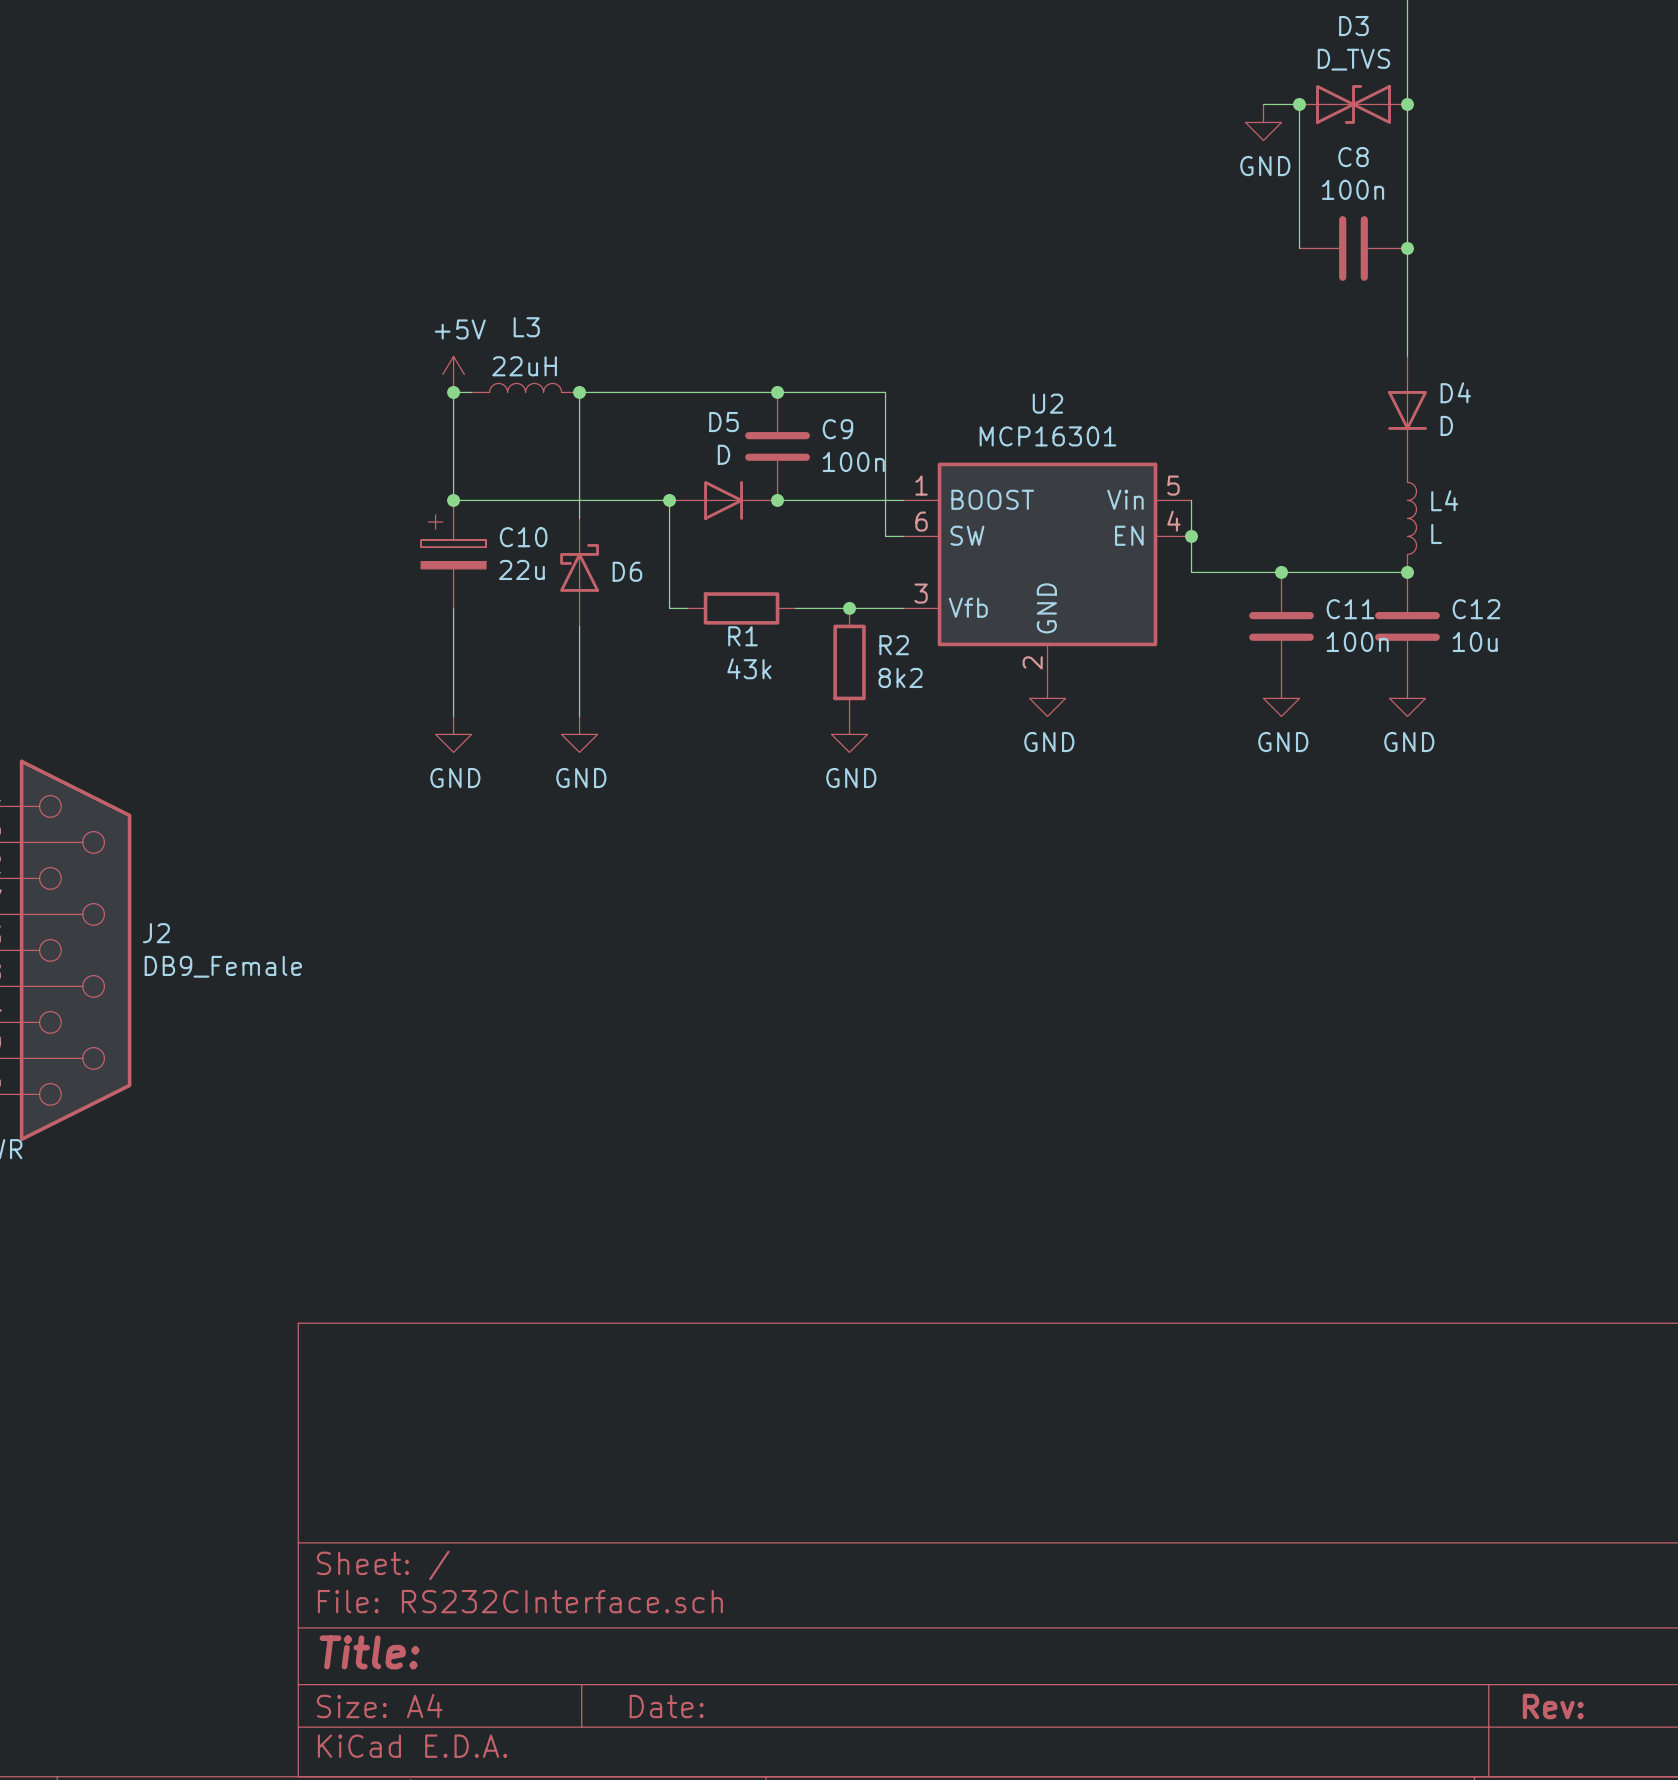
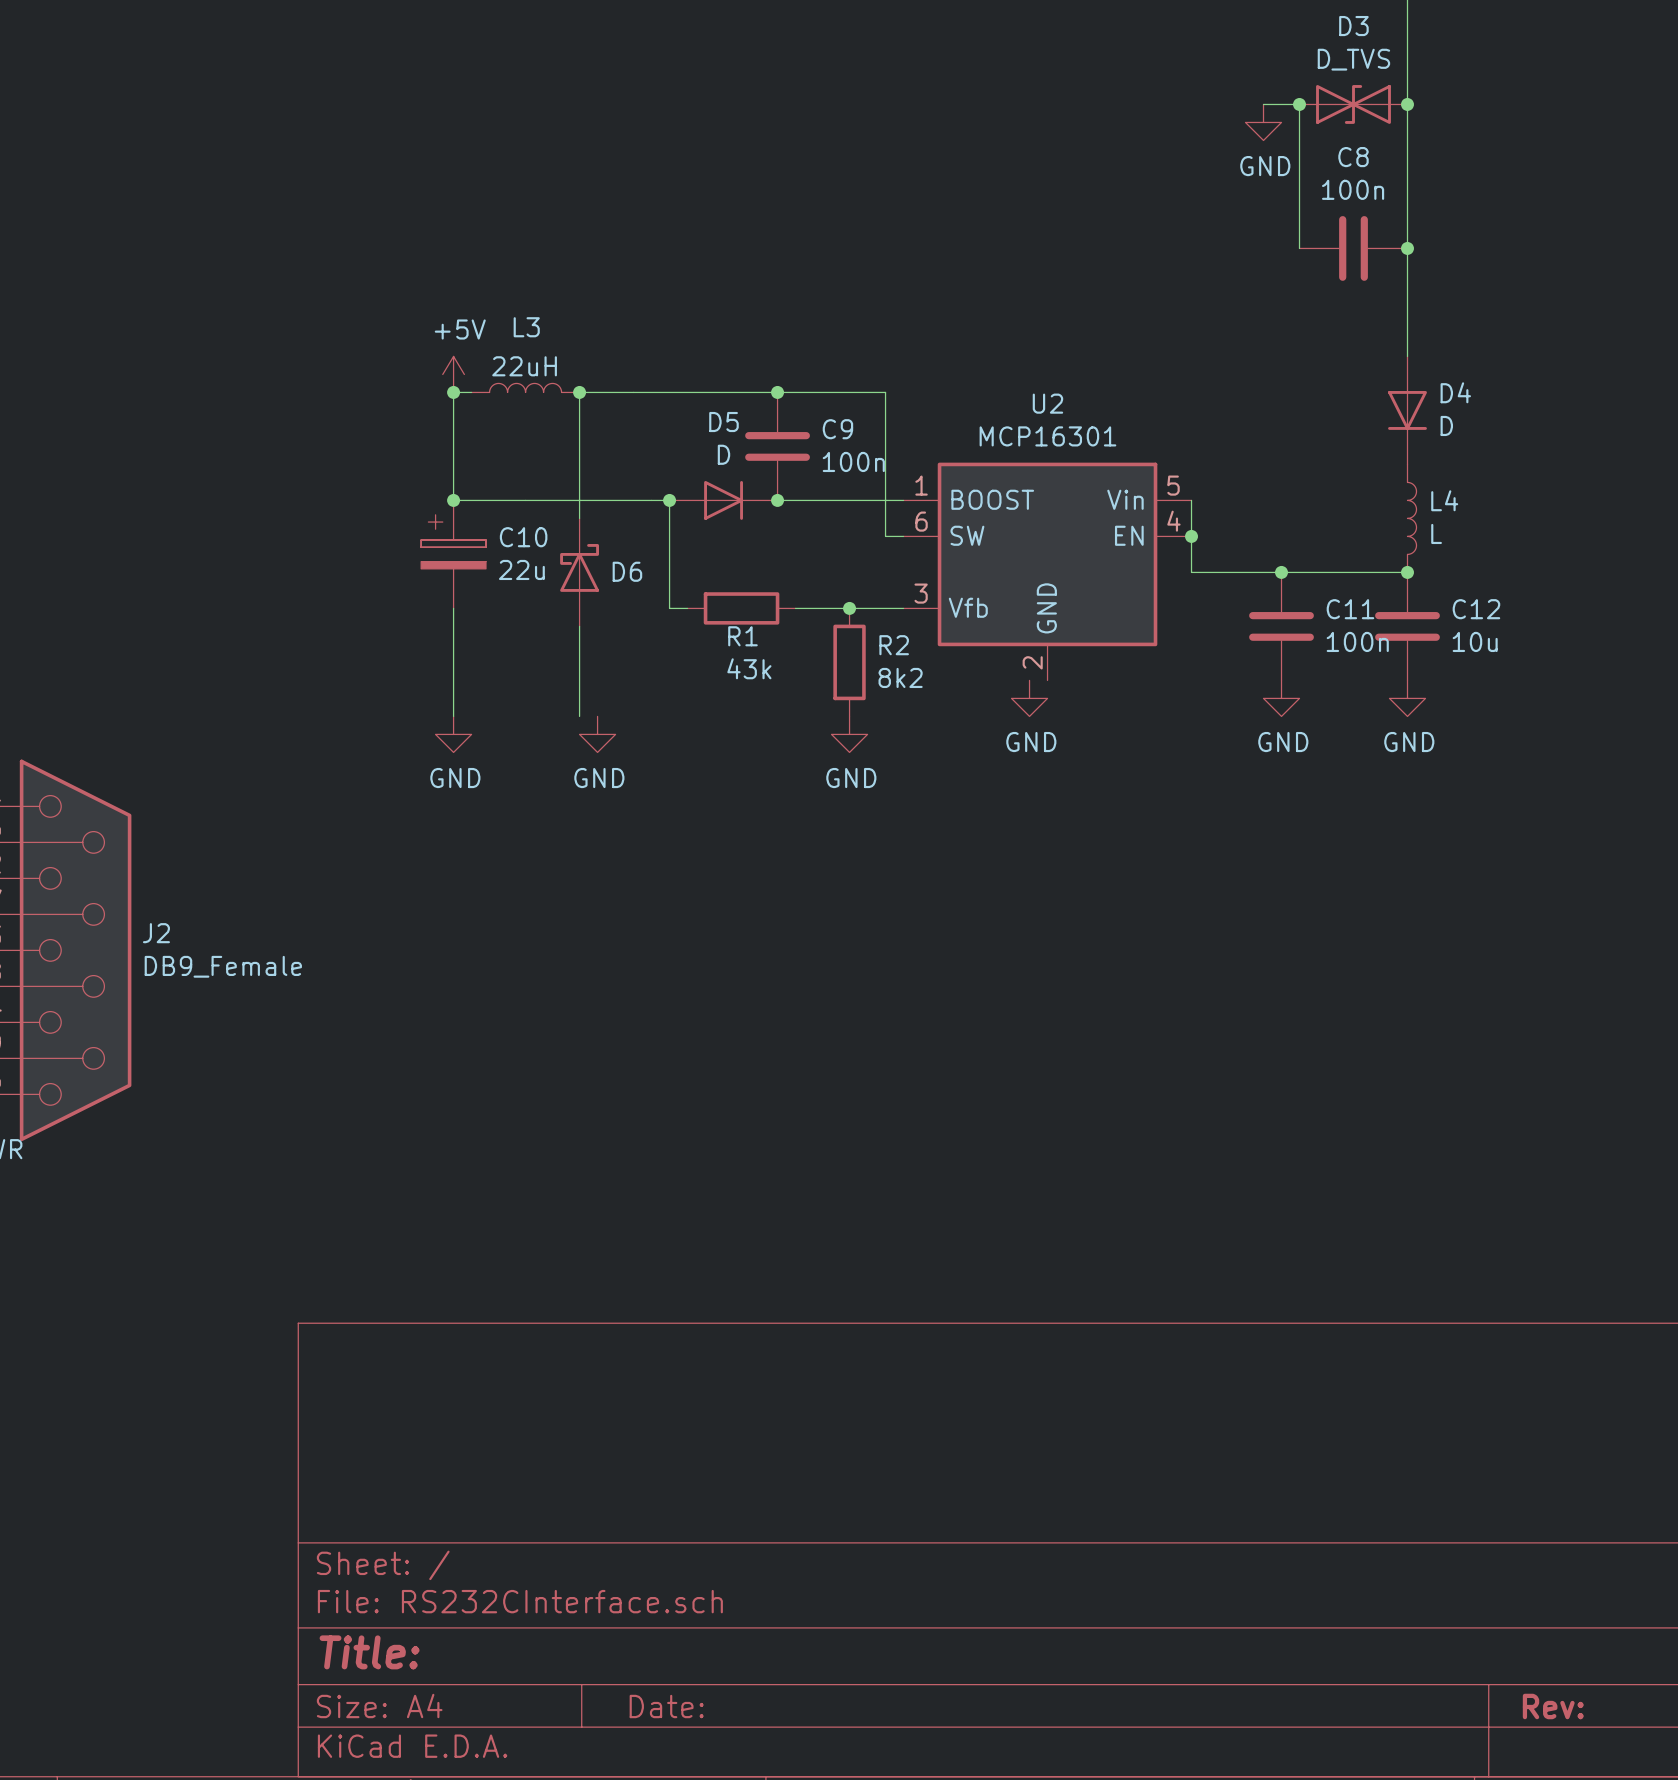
power symbol position: GND (1047, 698) -> GND (1029, 698)
power symbol position: GND (579, 734) -> GND (597, 734)

